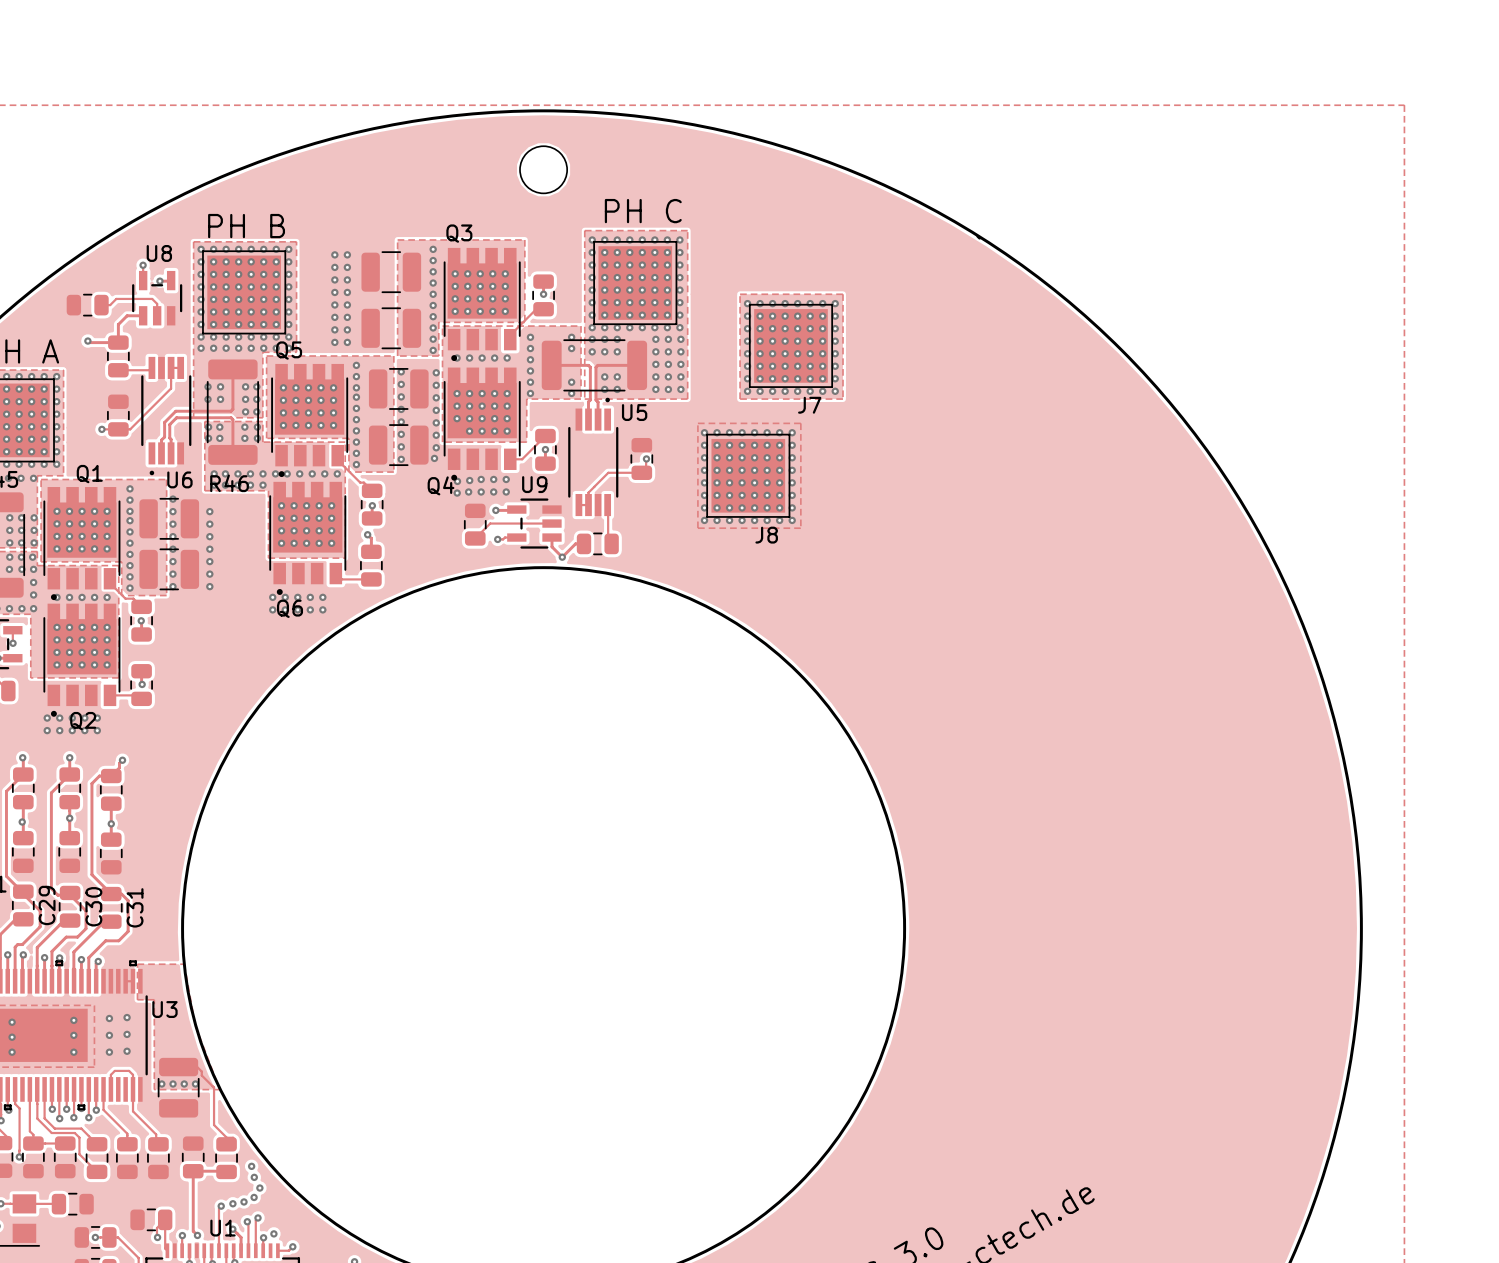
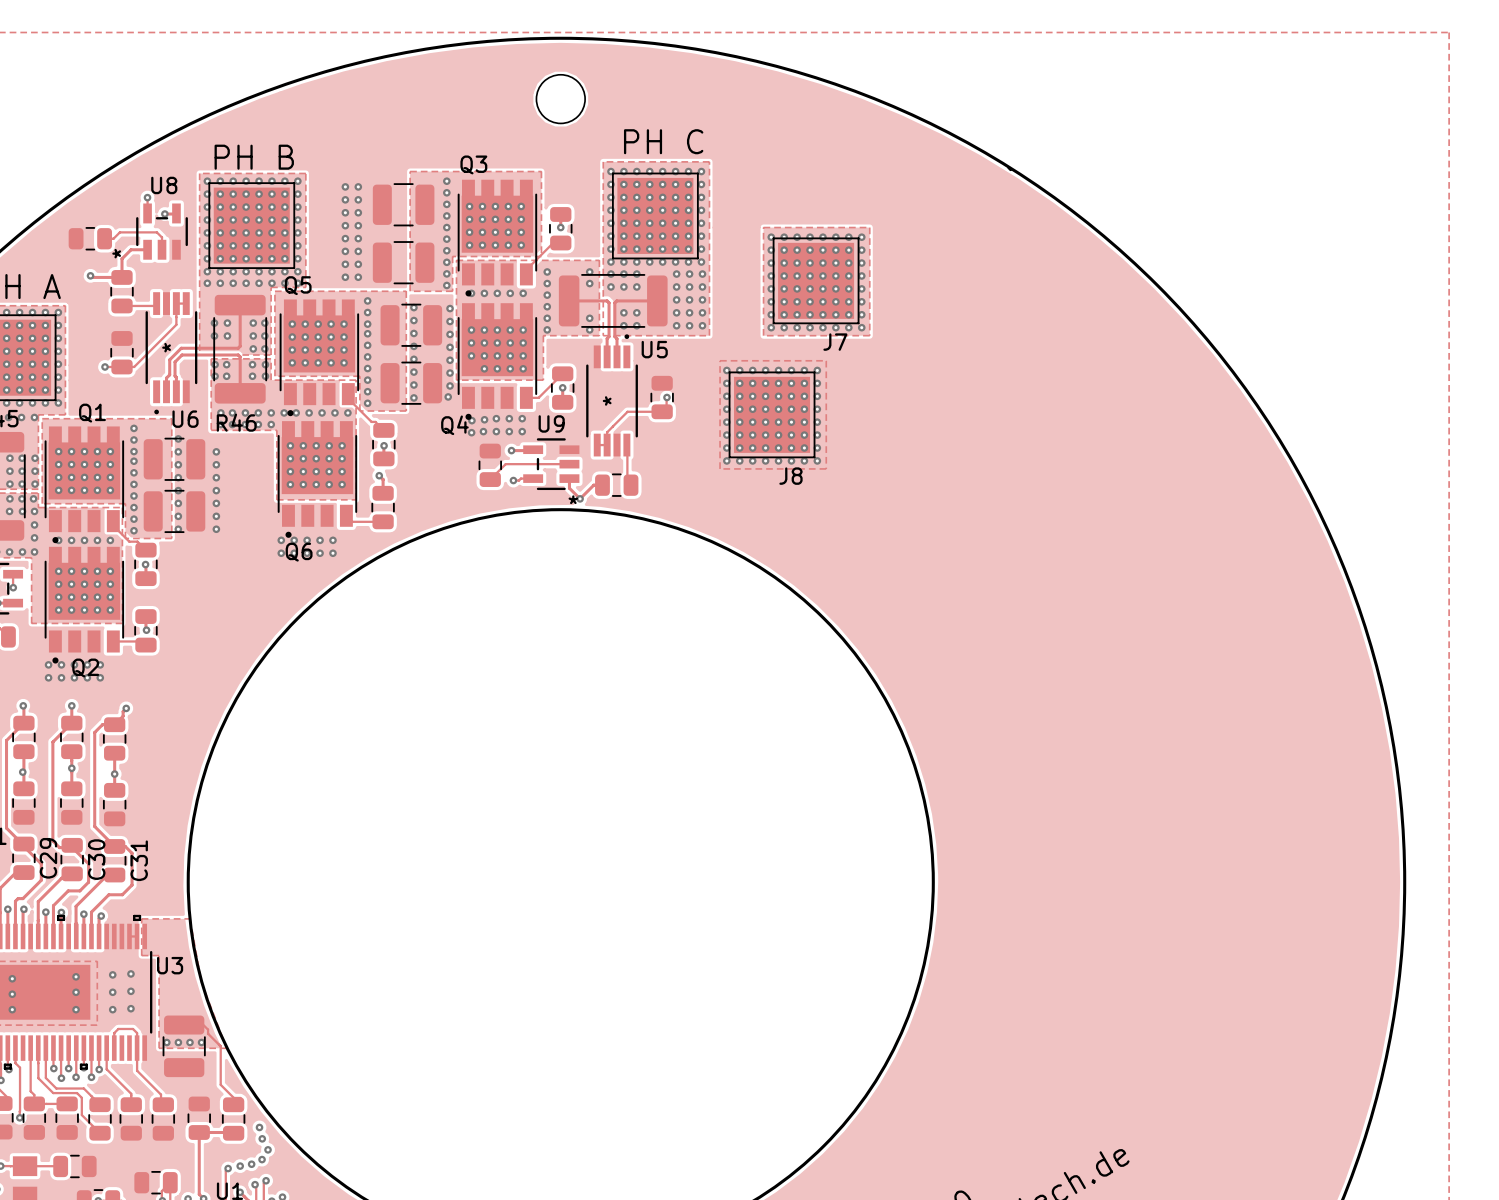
U8 text: none -> * (116, 253)
U6 text: none -> * (166, 347)
U5 text: none -> * (607, 400)
U9 text: none -> * (573, 499)

